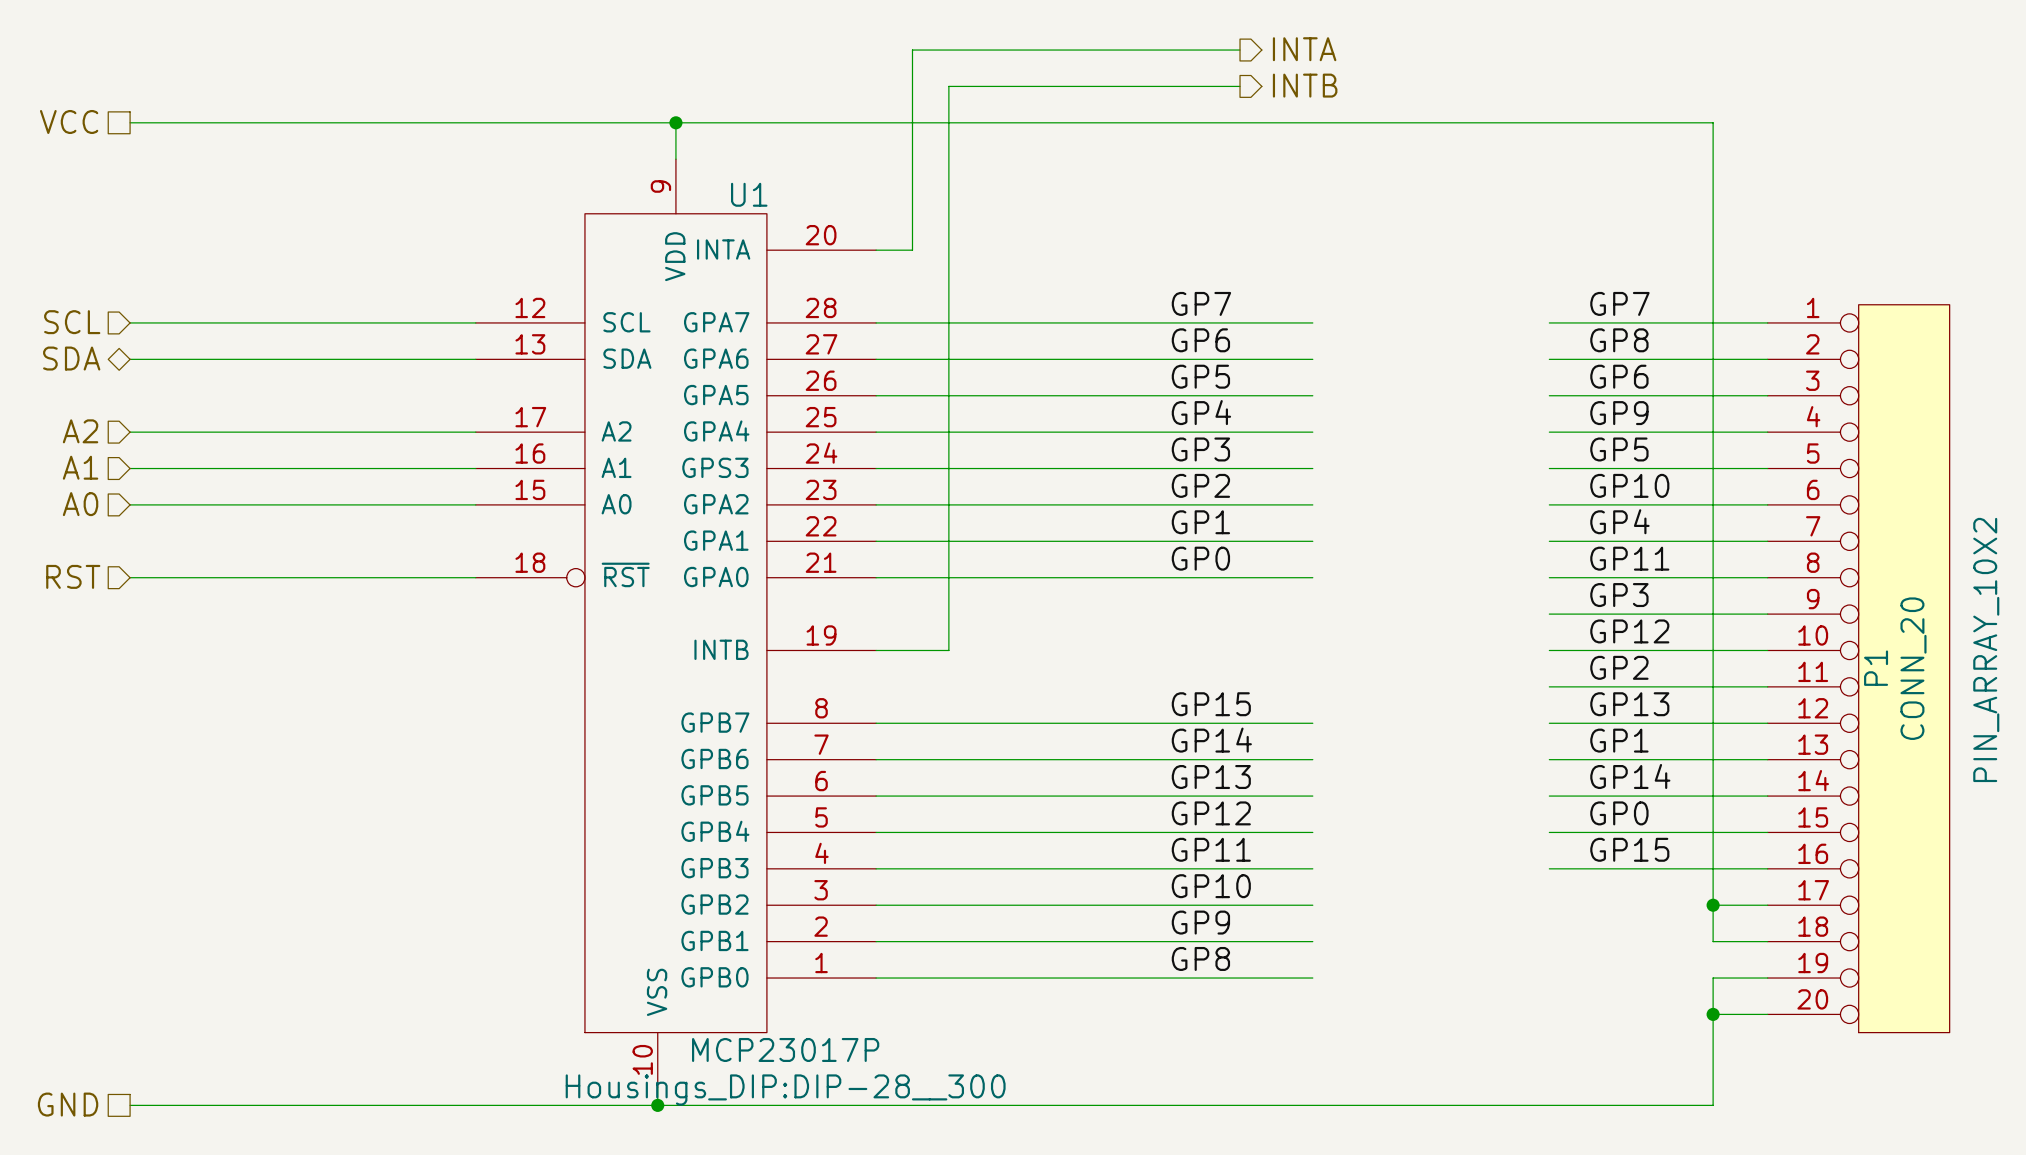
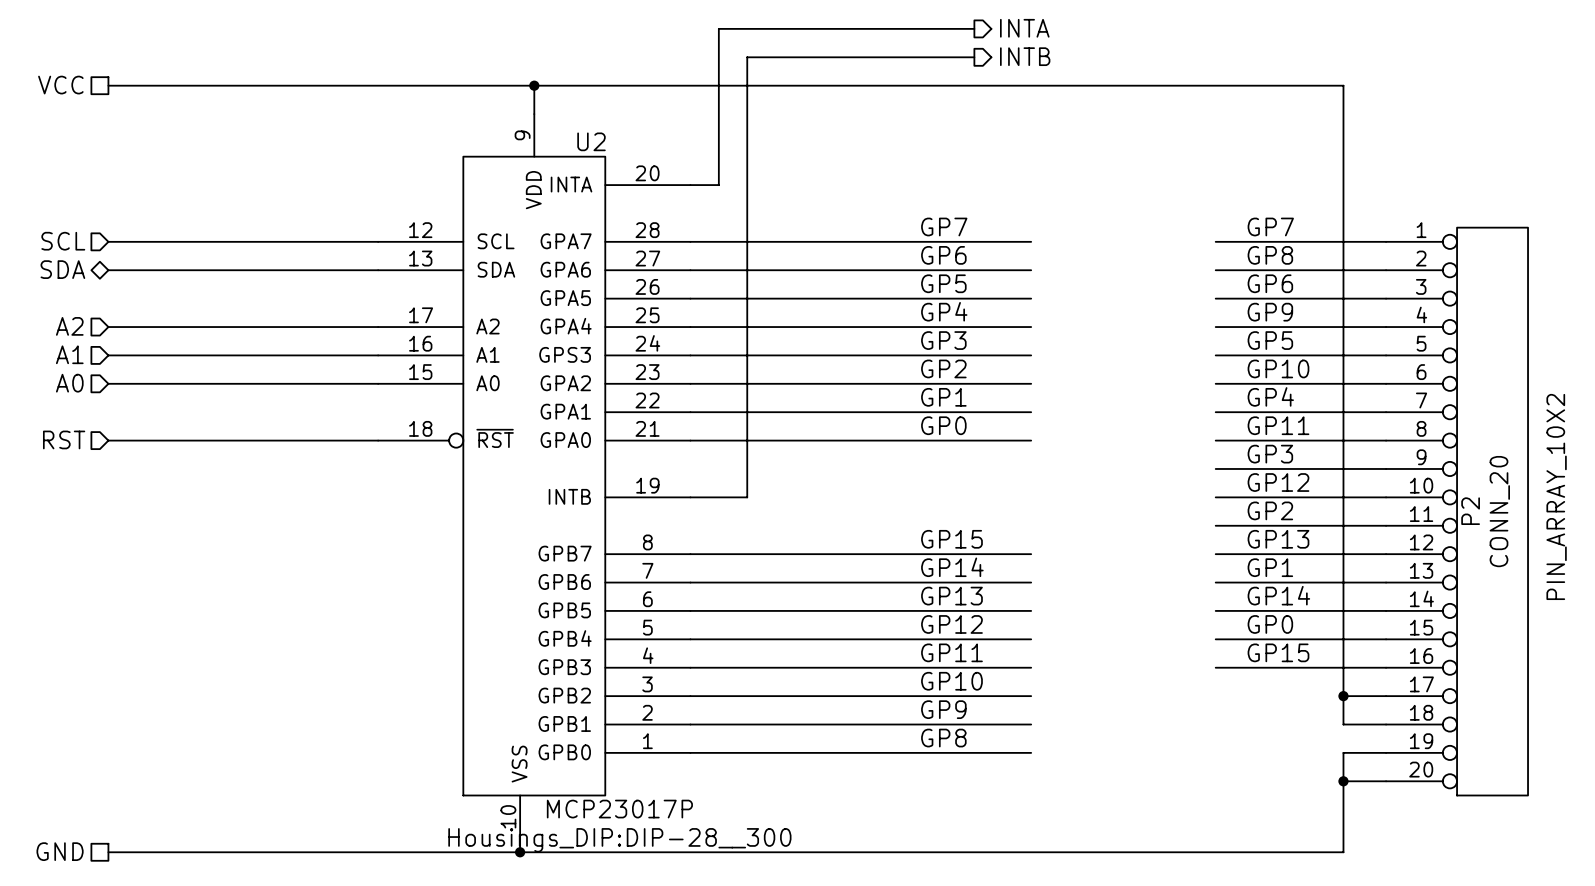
U1 name: U1 (749, 194) -> U2 (591, 141)
P1 name: P1 (1876, 668) -> P2 (1470, 511)

